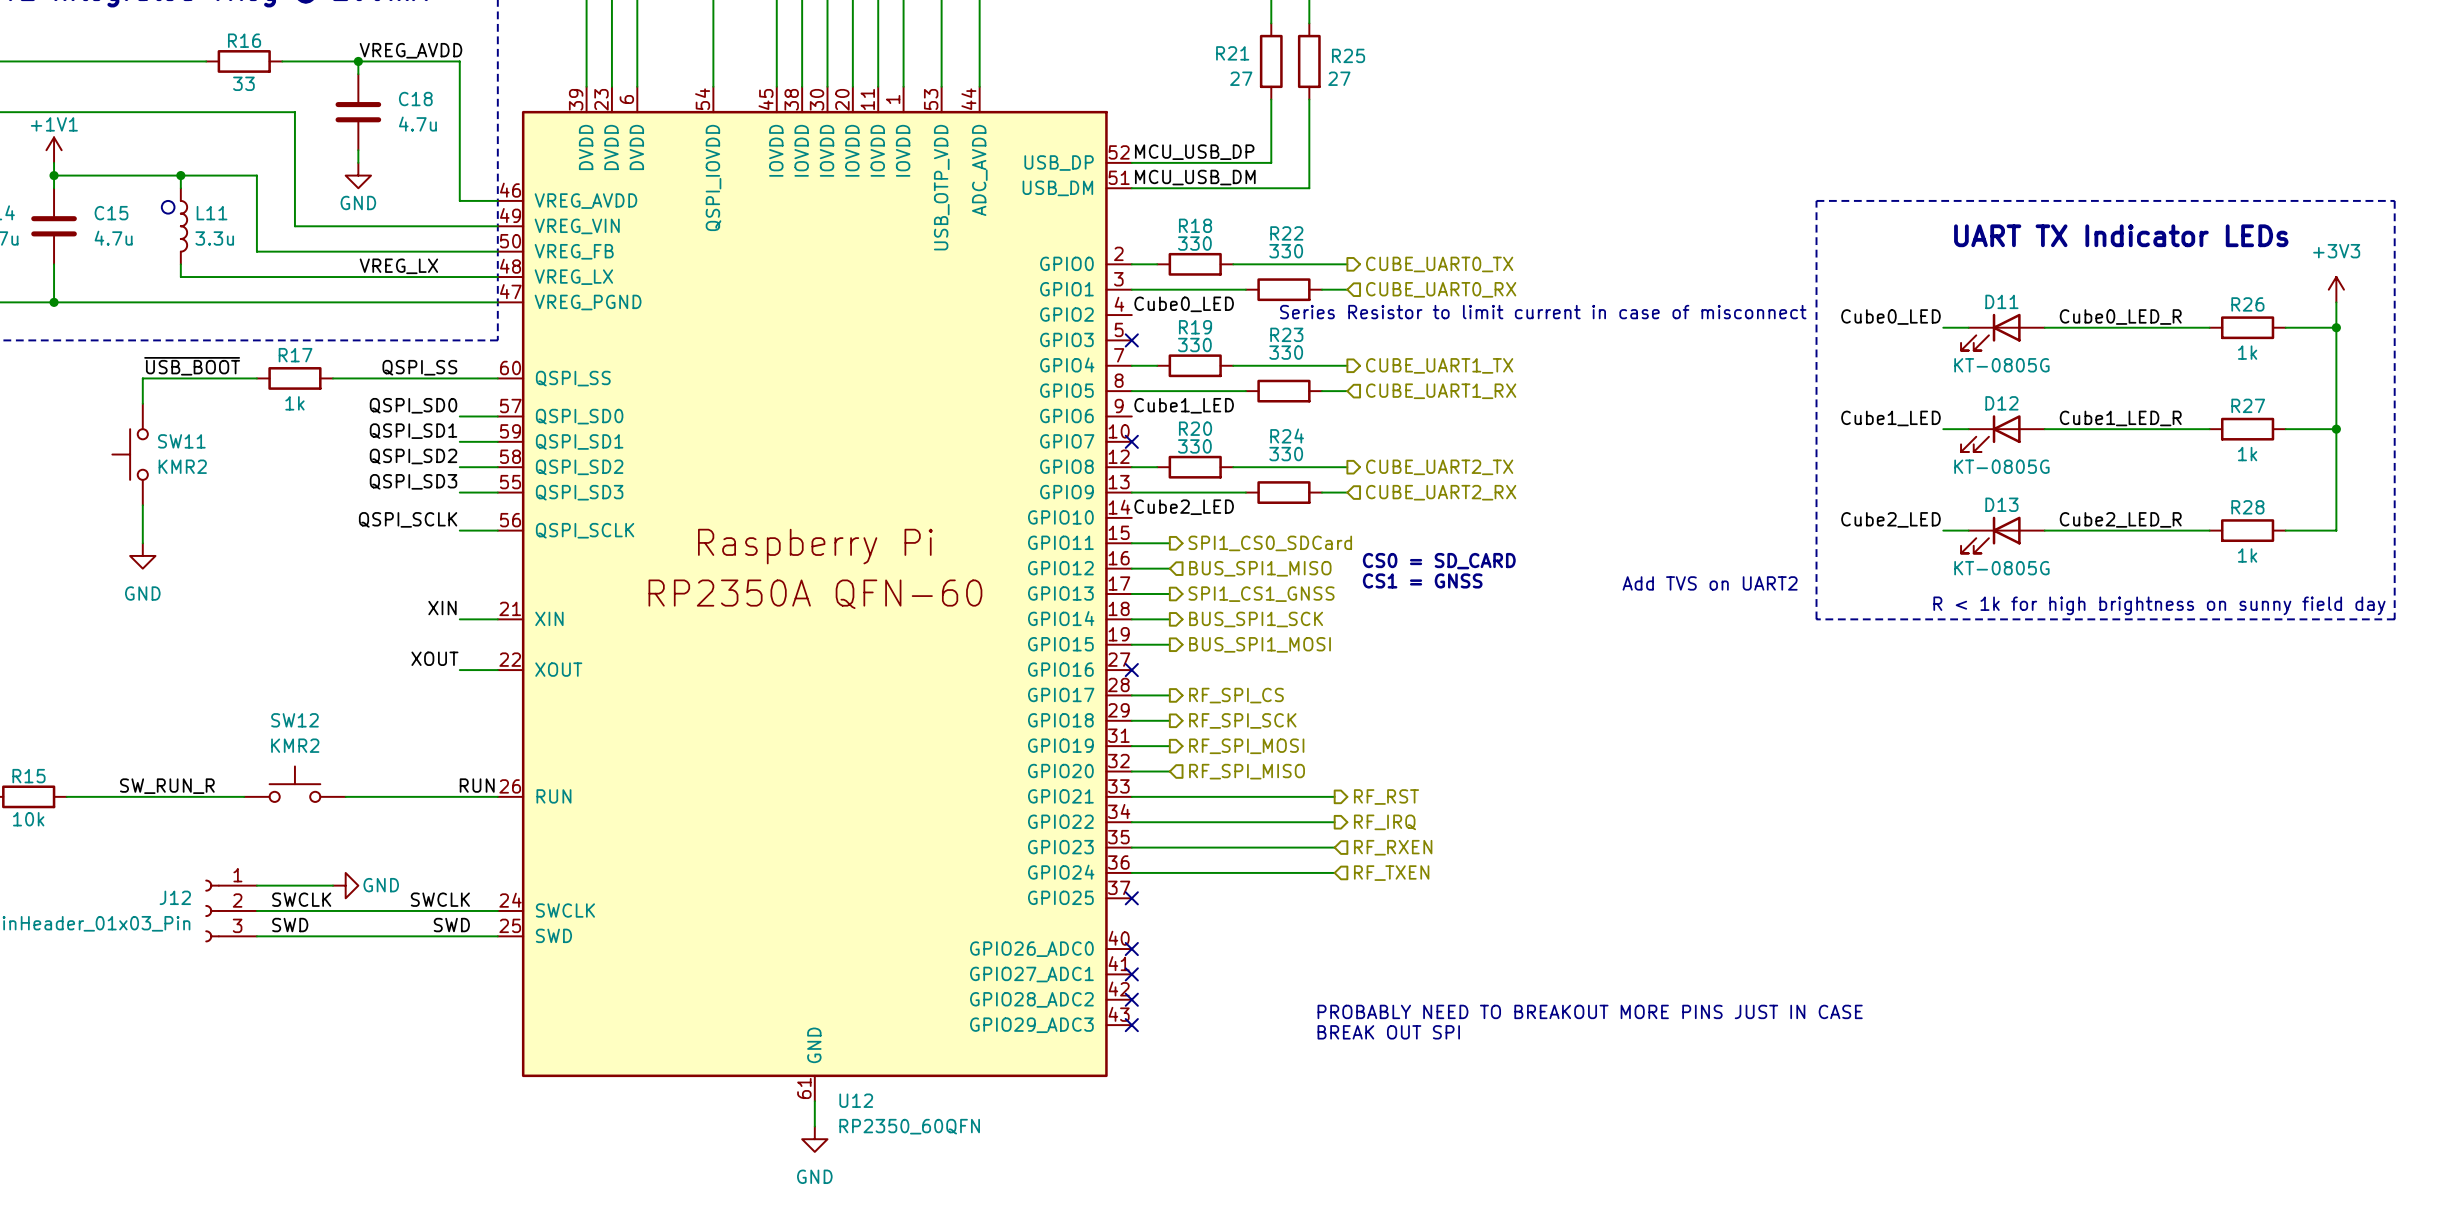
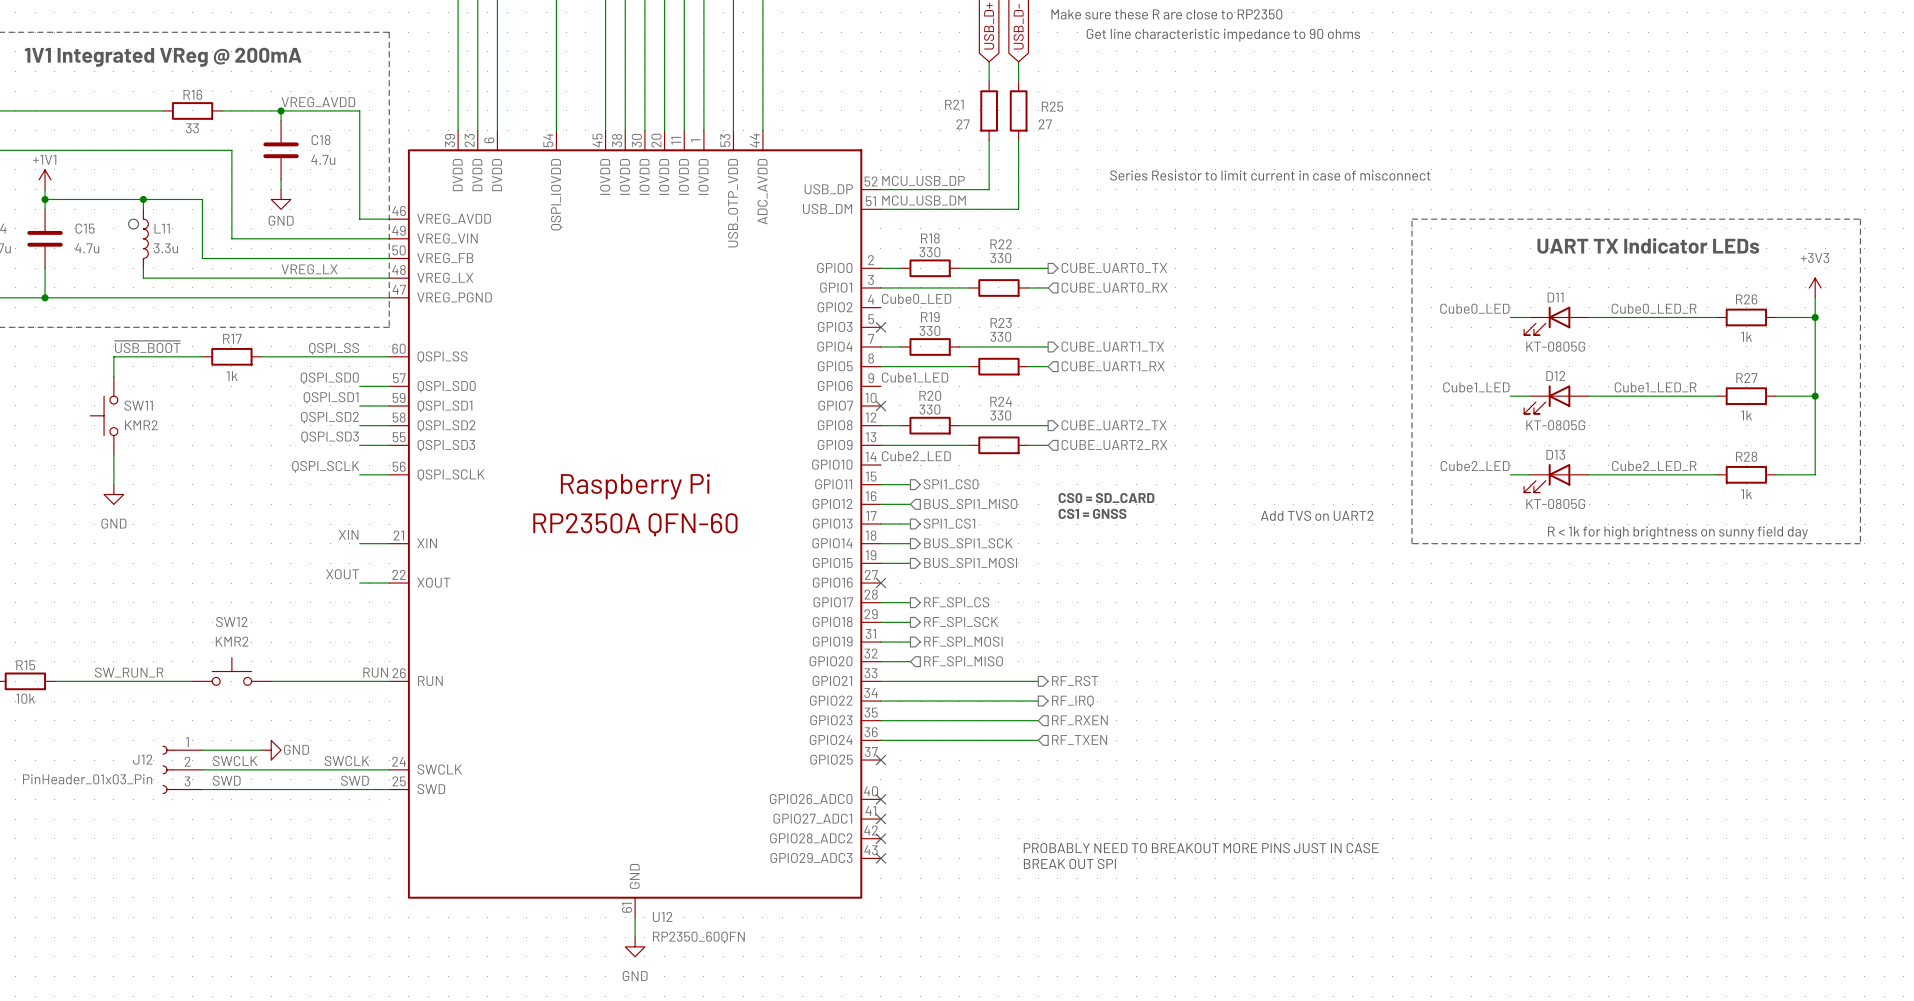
text position: Series Resistor to limit current in case of misconnect (1543, 312) -> Series Resistor to limit current in case of misconnect (1270, 175)
hierarchical label: SPI1_CS0_SDCard (1270, 543) -> SPI1_CS0 (951, 484)
hierarchical label: SPI1_CS1_GNSS (1261, 594) -> SPI1_CS1 (949, 523)

